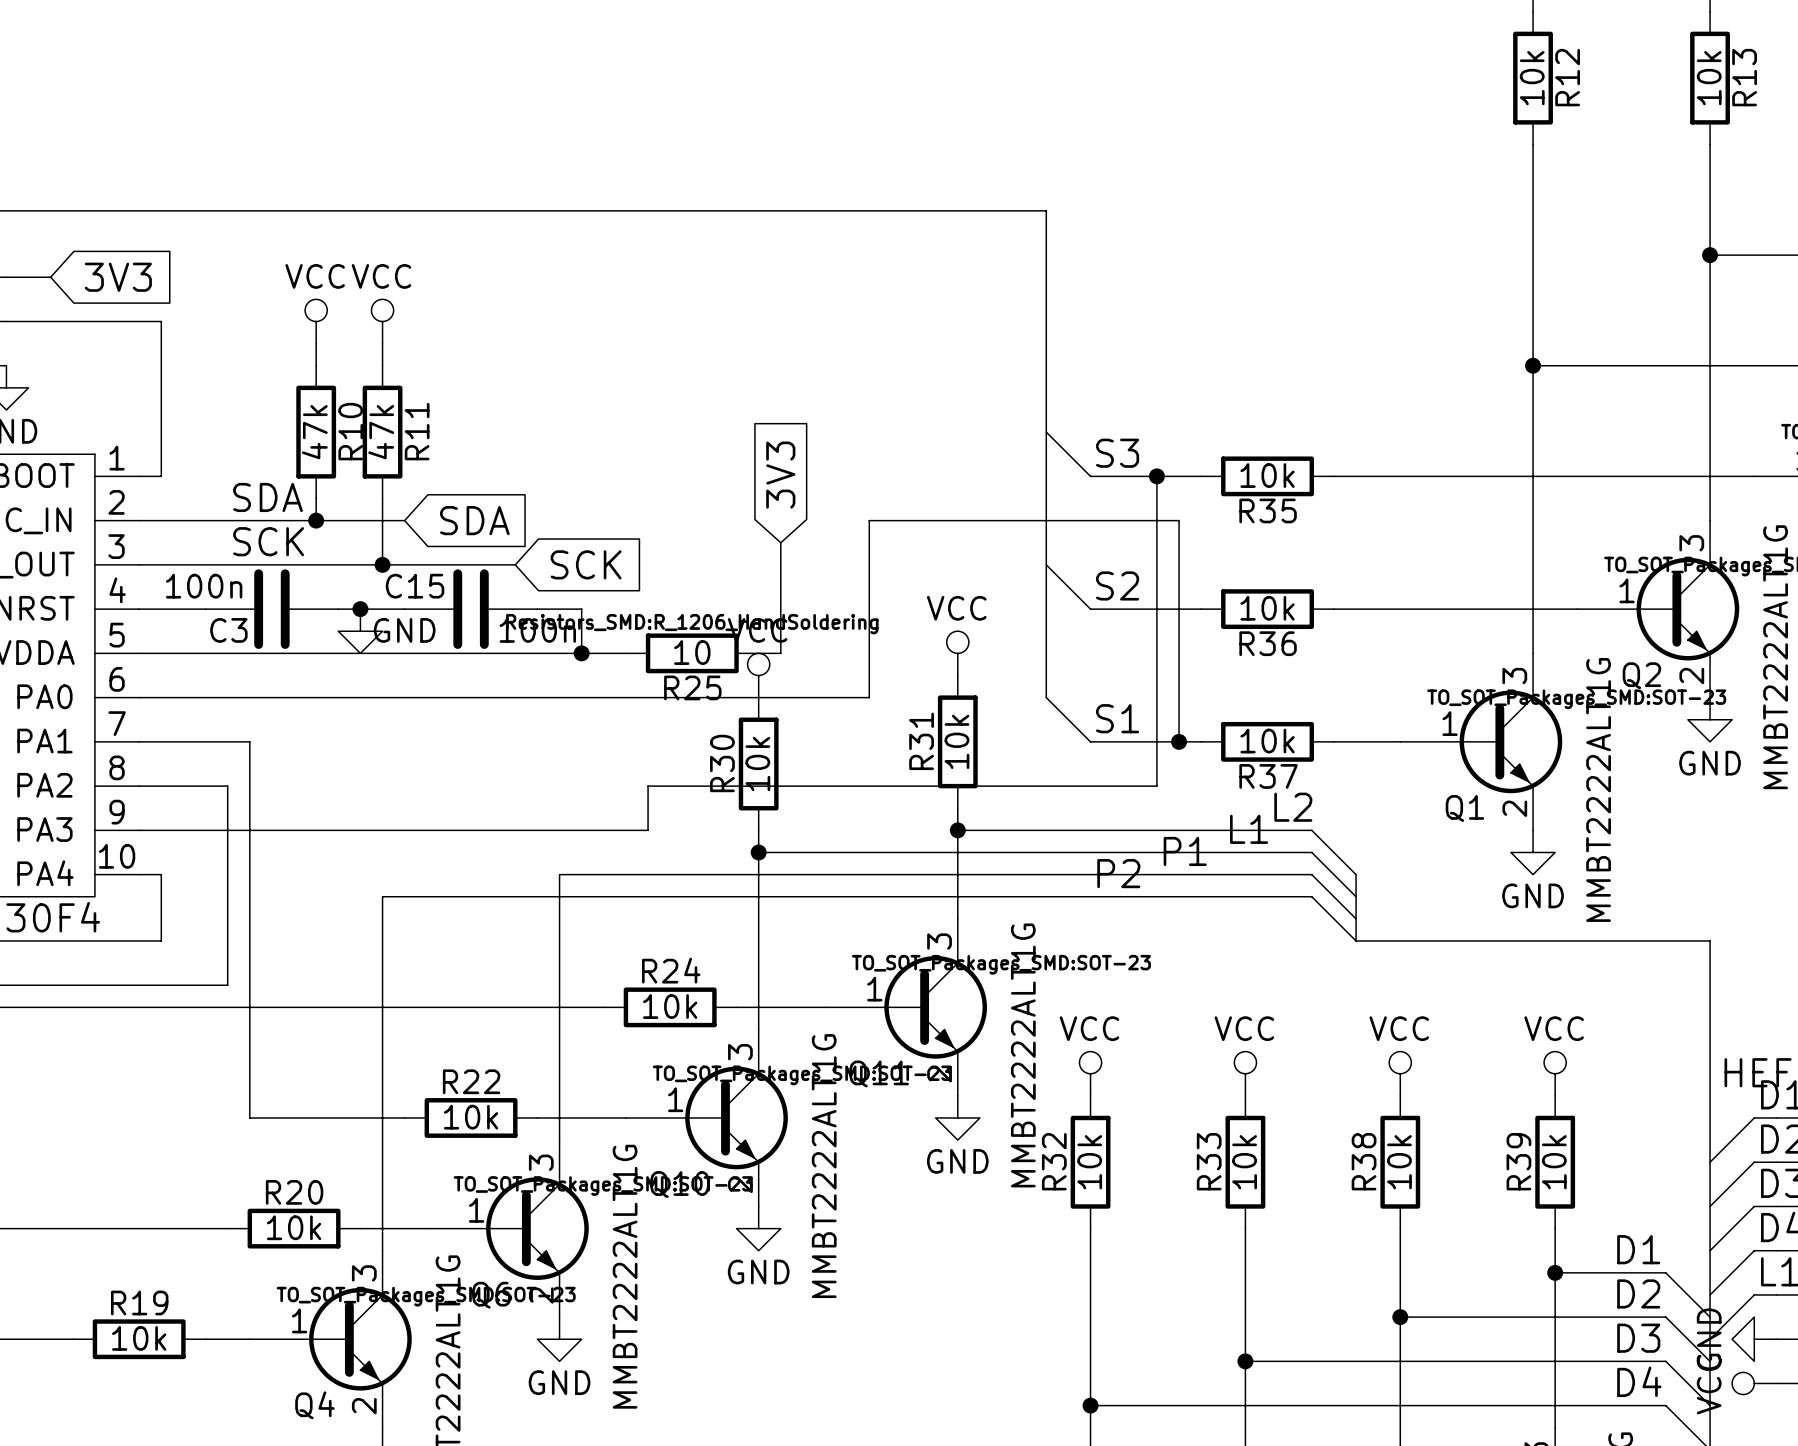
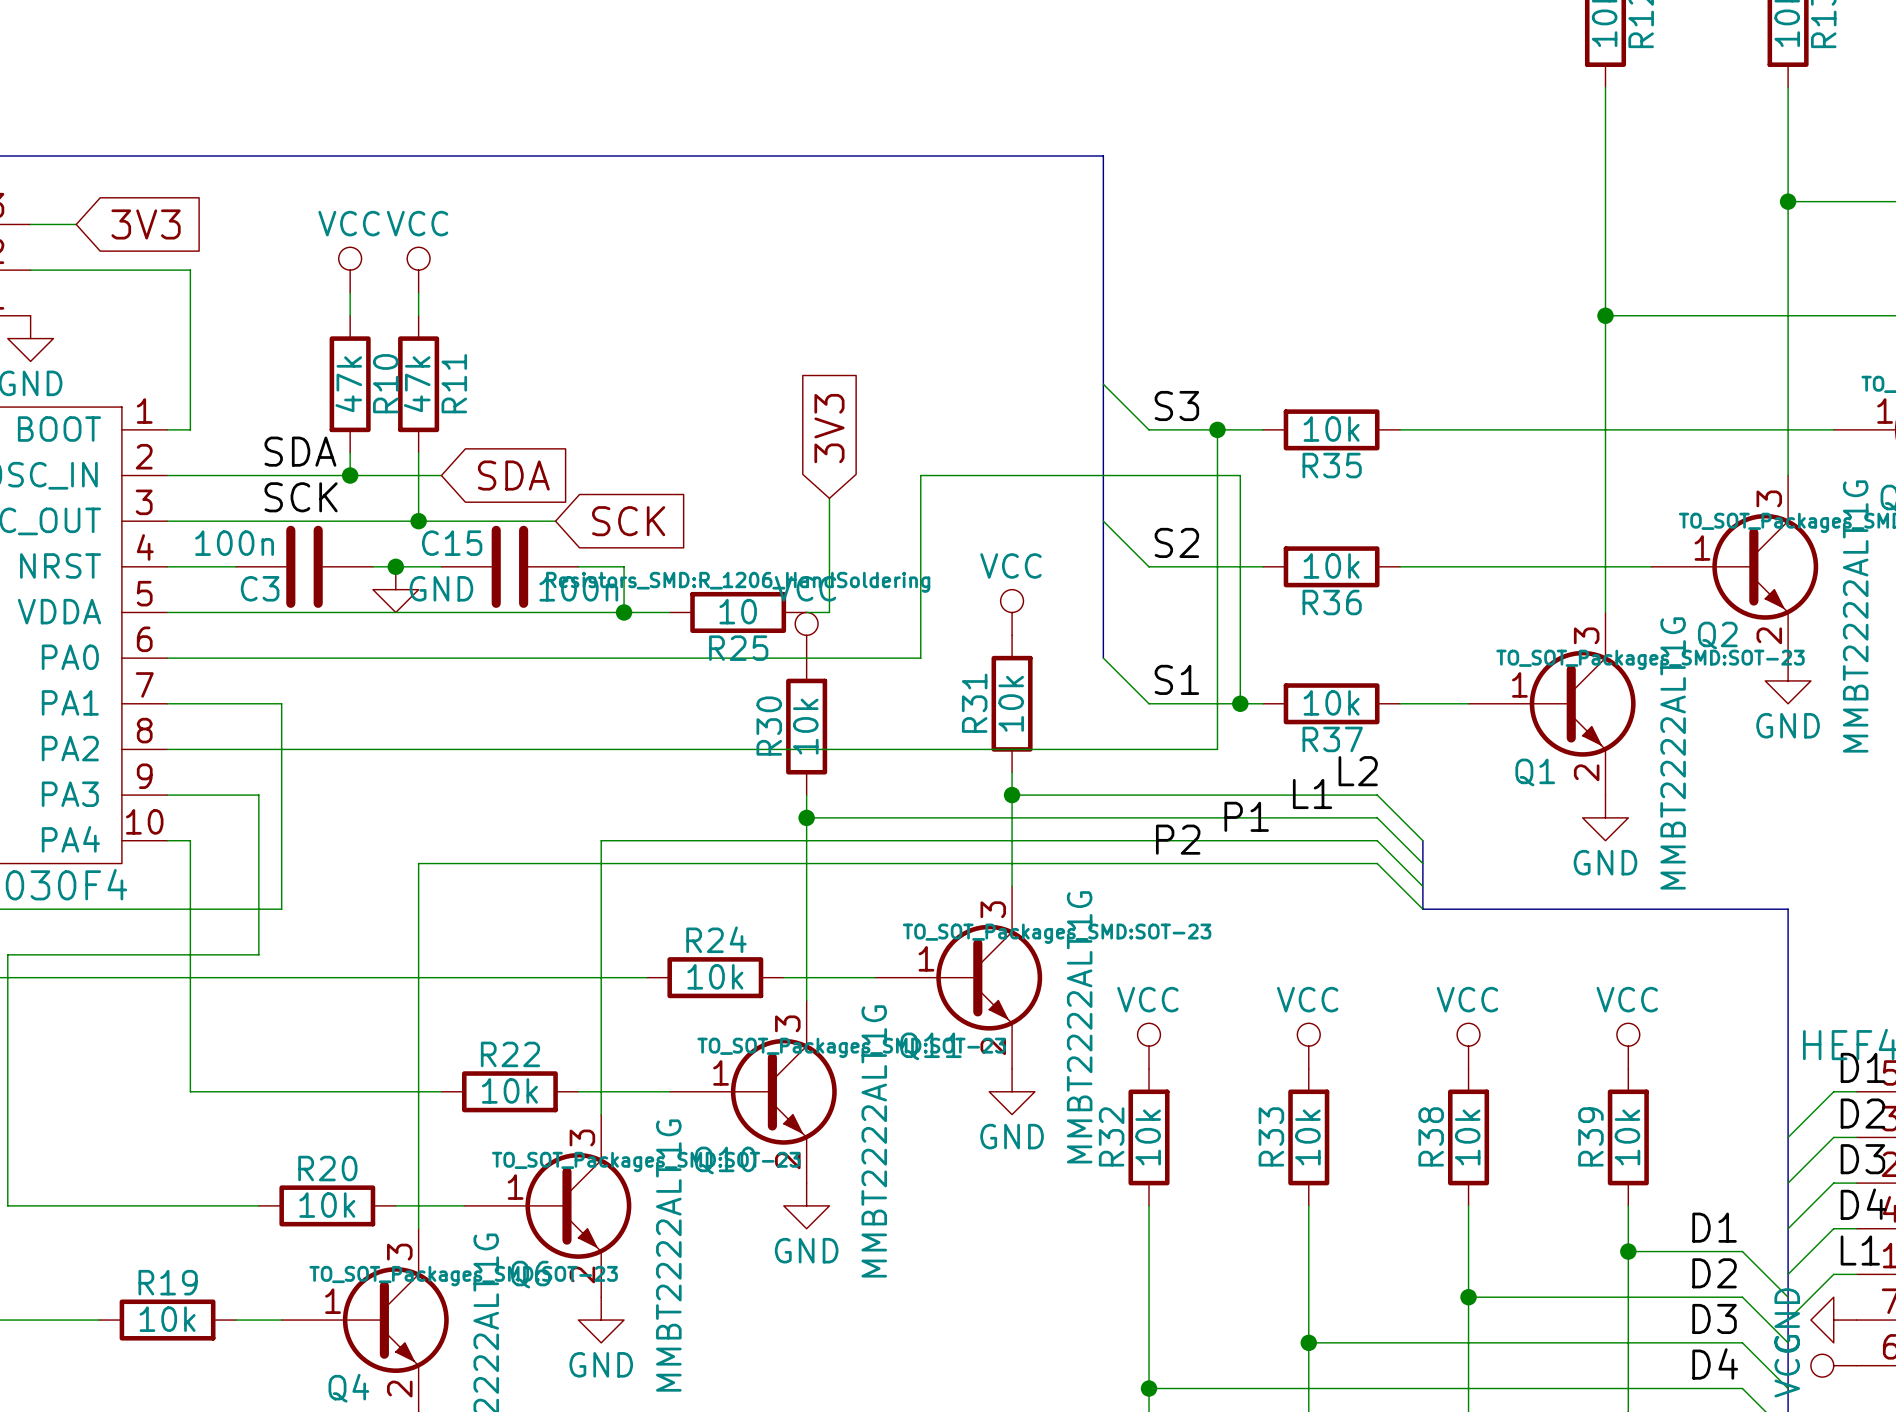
wire: (227, 786) (227, 830) (648, 830) (648, 786) -> (258, 749) (692, 749)
wire: (249, 940) (249, 1117) -> (281, 909) (190, 909) (190, 1091) (281, 1091)

